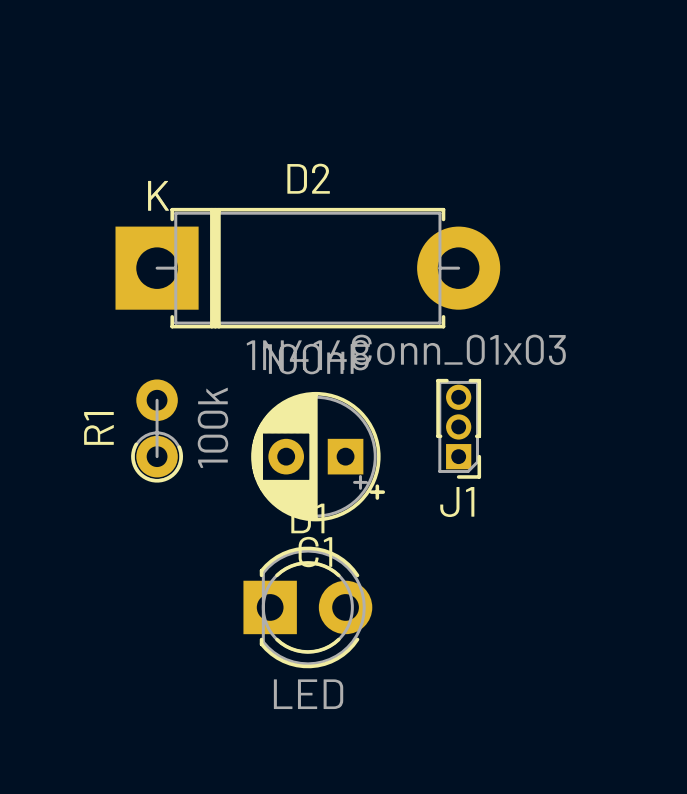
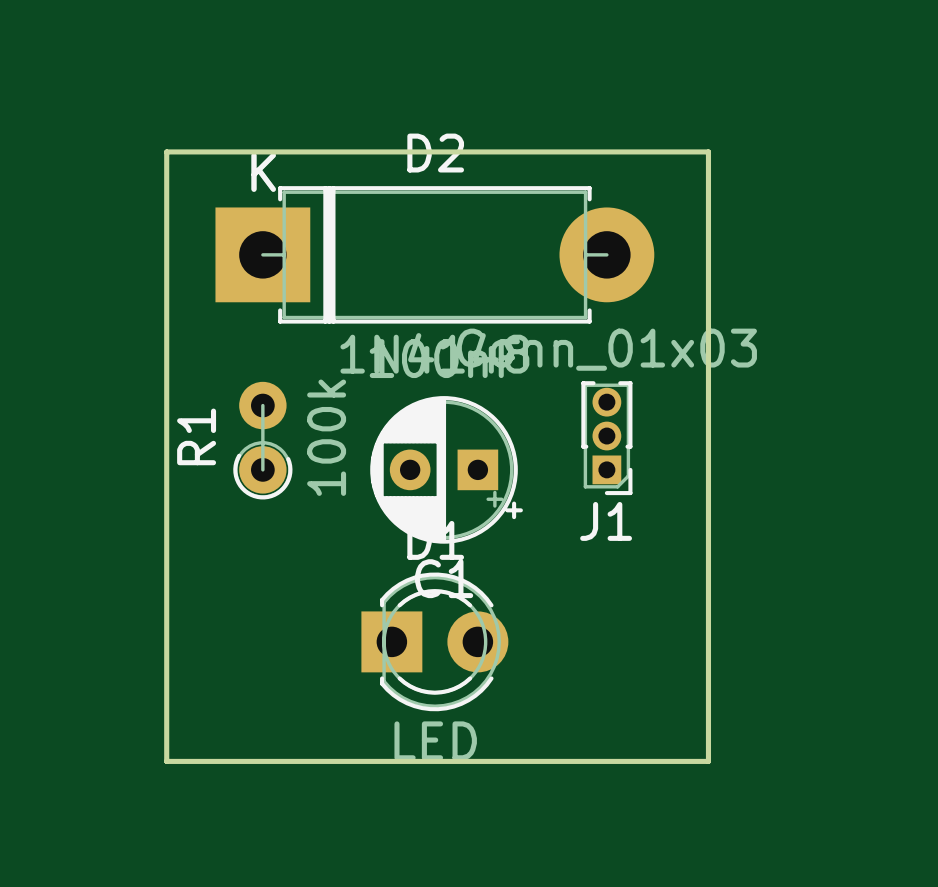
board edge: none -> (166, 151) (708, 151) (708, 761) (166, 761) (166, 151)

